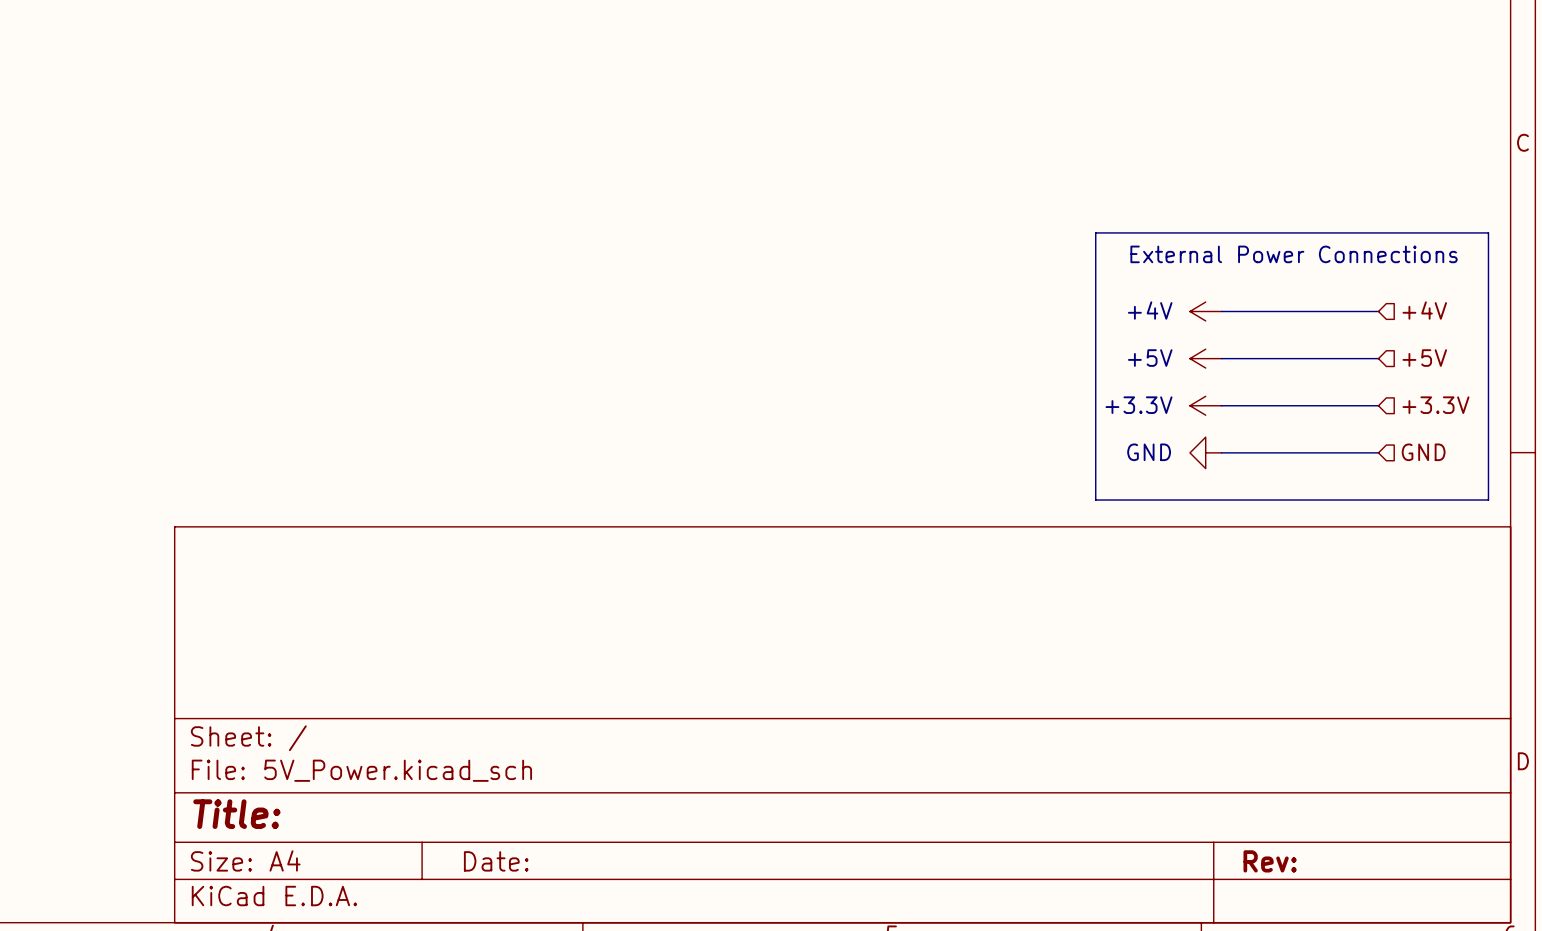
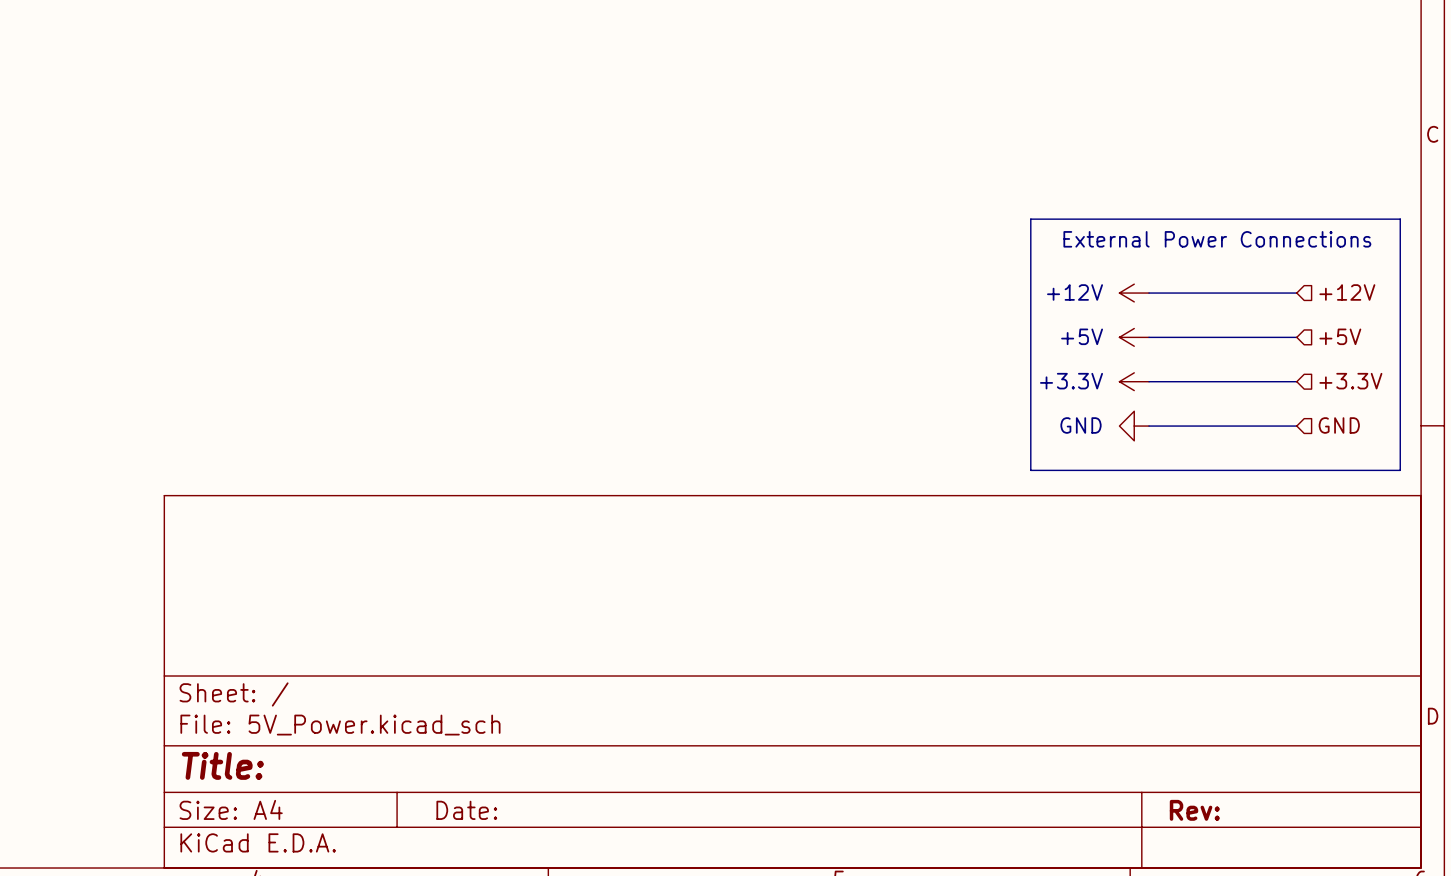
hierarchical label: +4V (1424, 310) -> +12V (1347, 292)
power symbol: +4V (1205, 311) -> +12V (1134, 293)

